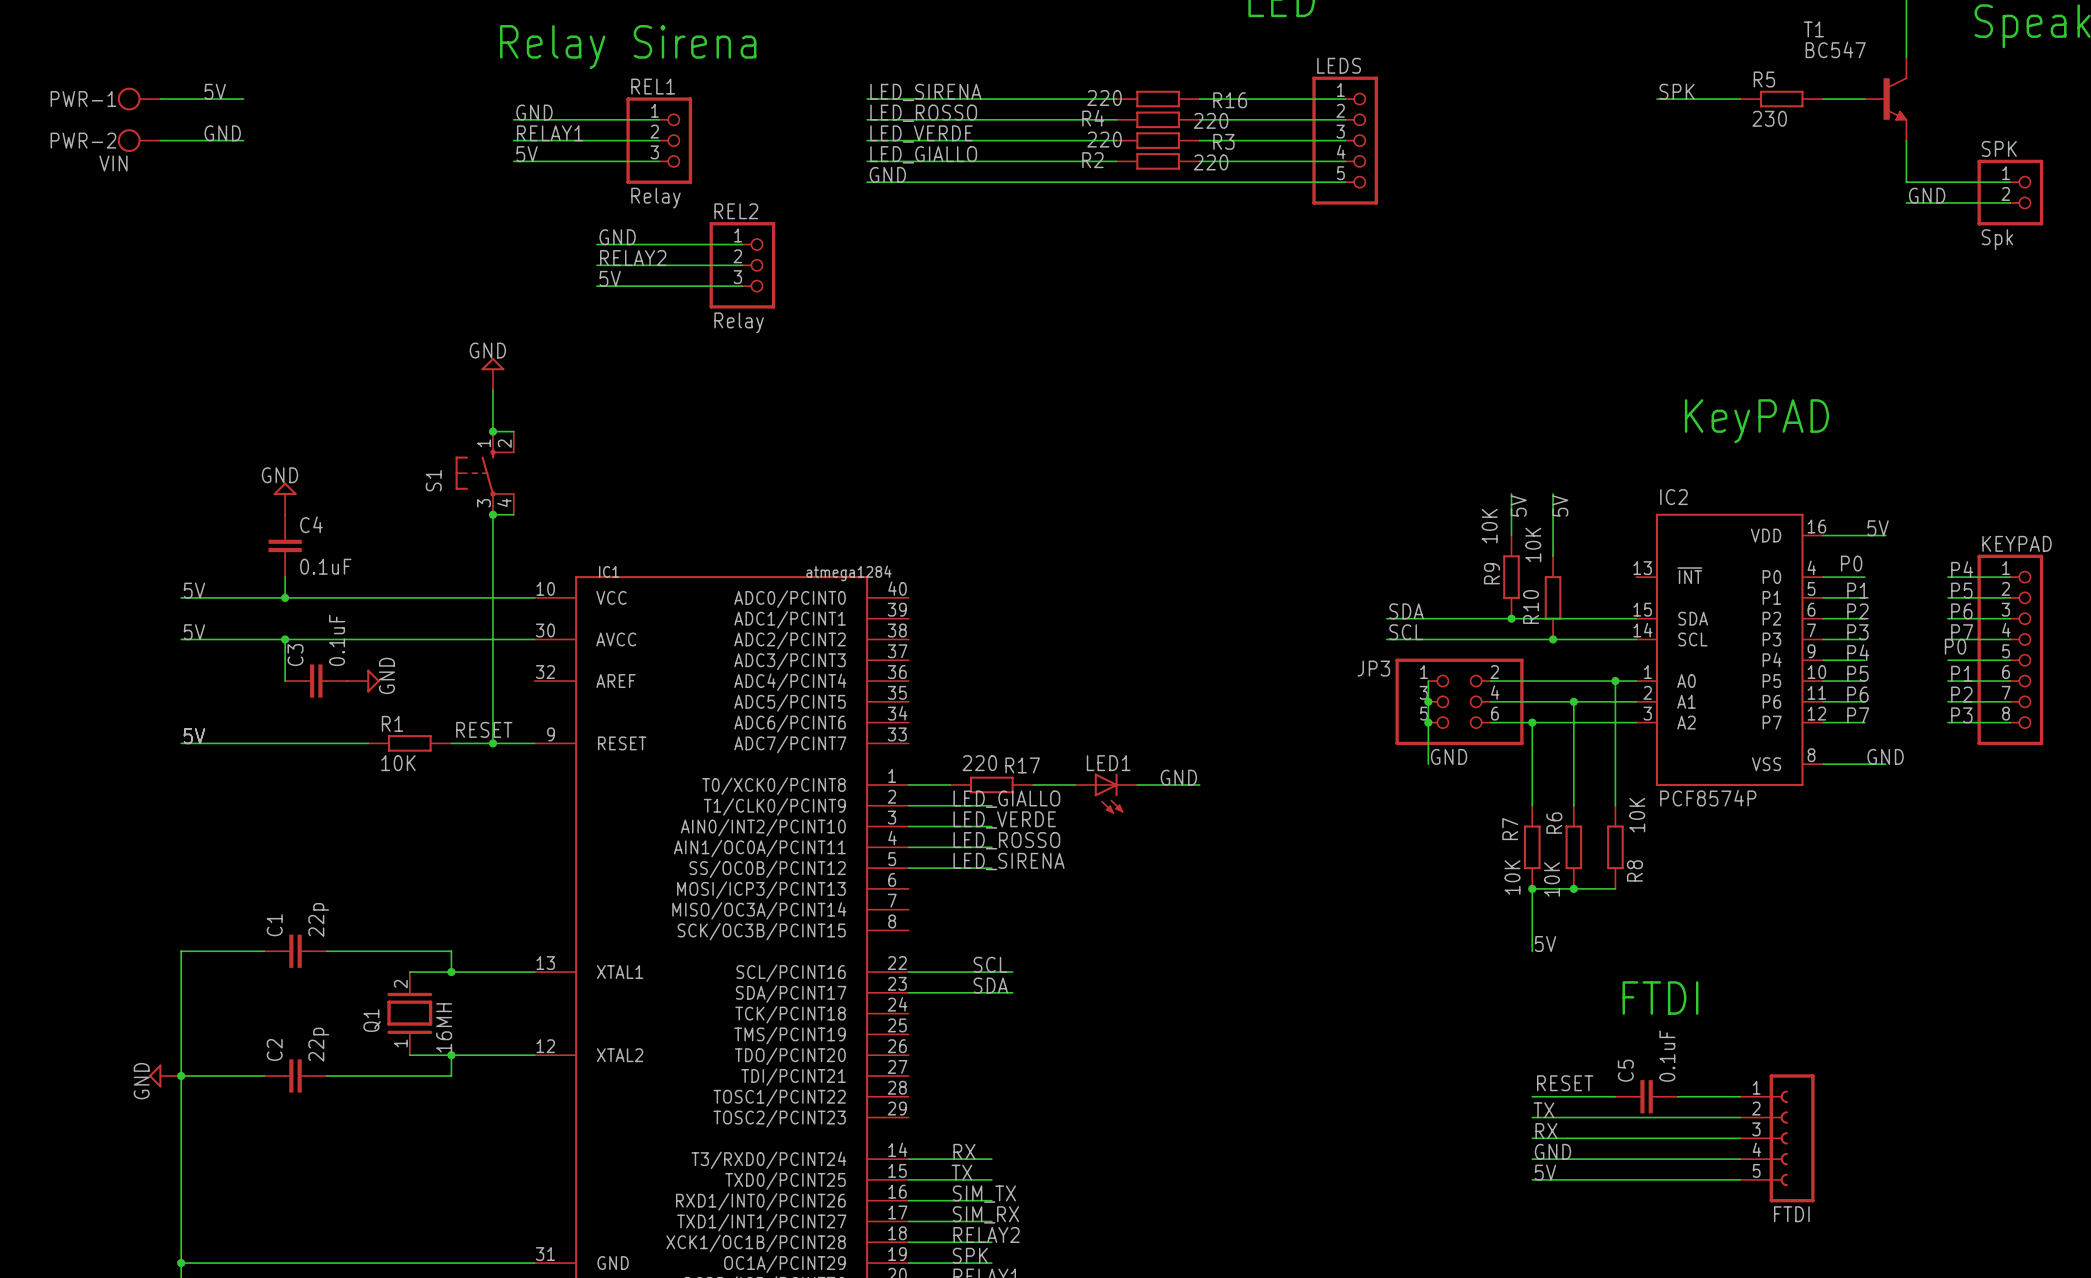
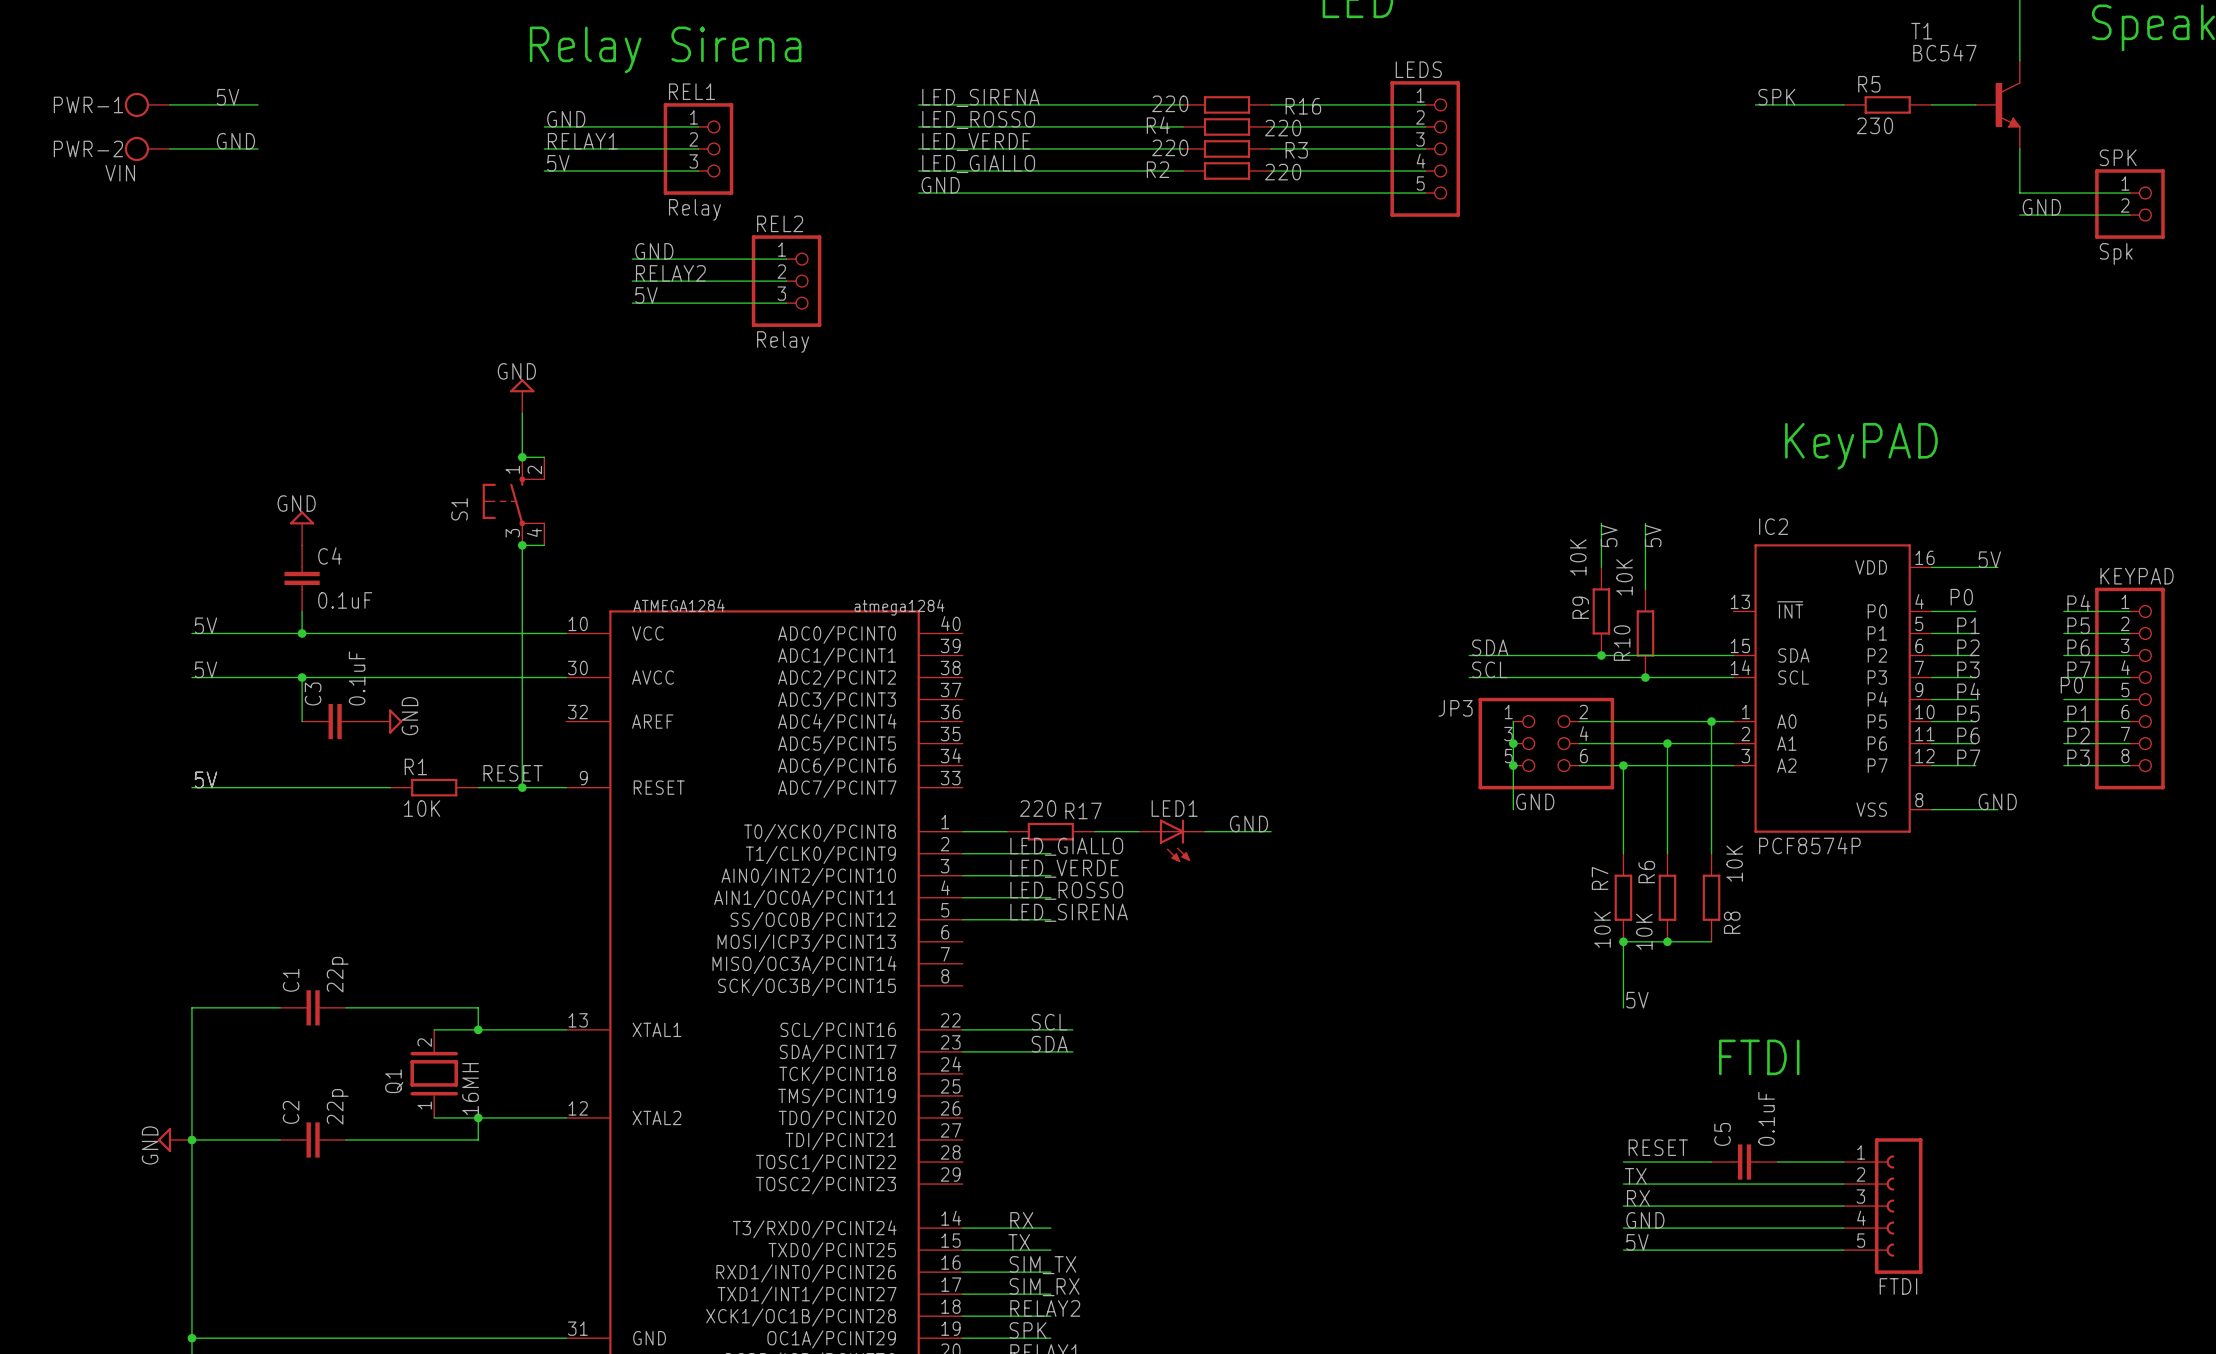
IC1 name: IC1 (609, 571) -> ATMEGA1284 (679, 605)

